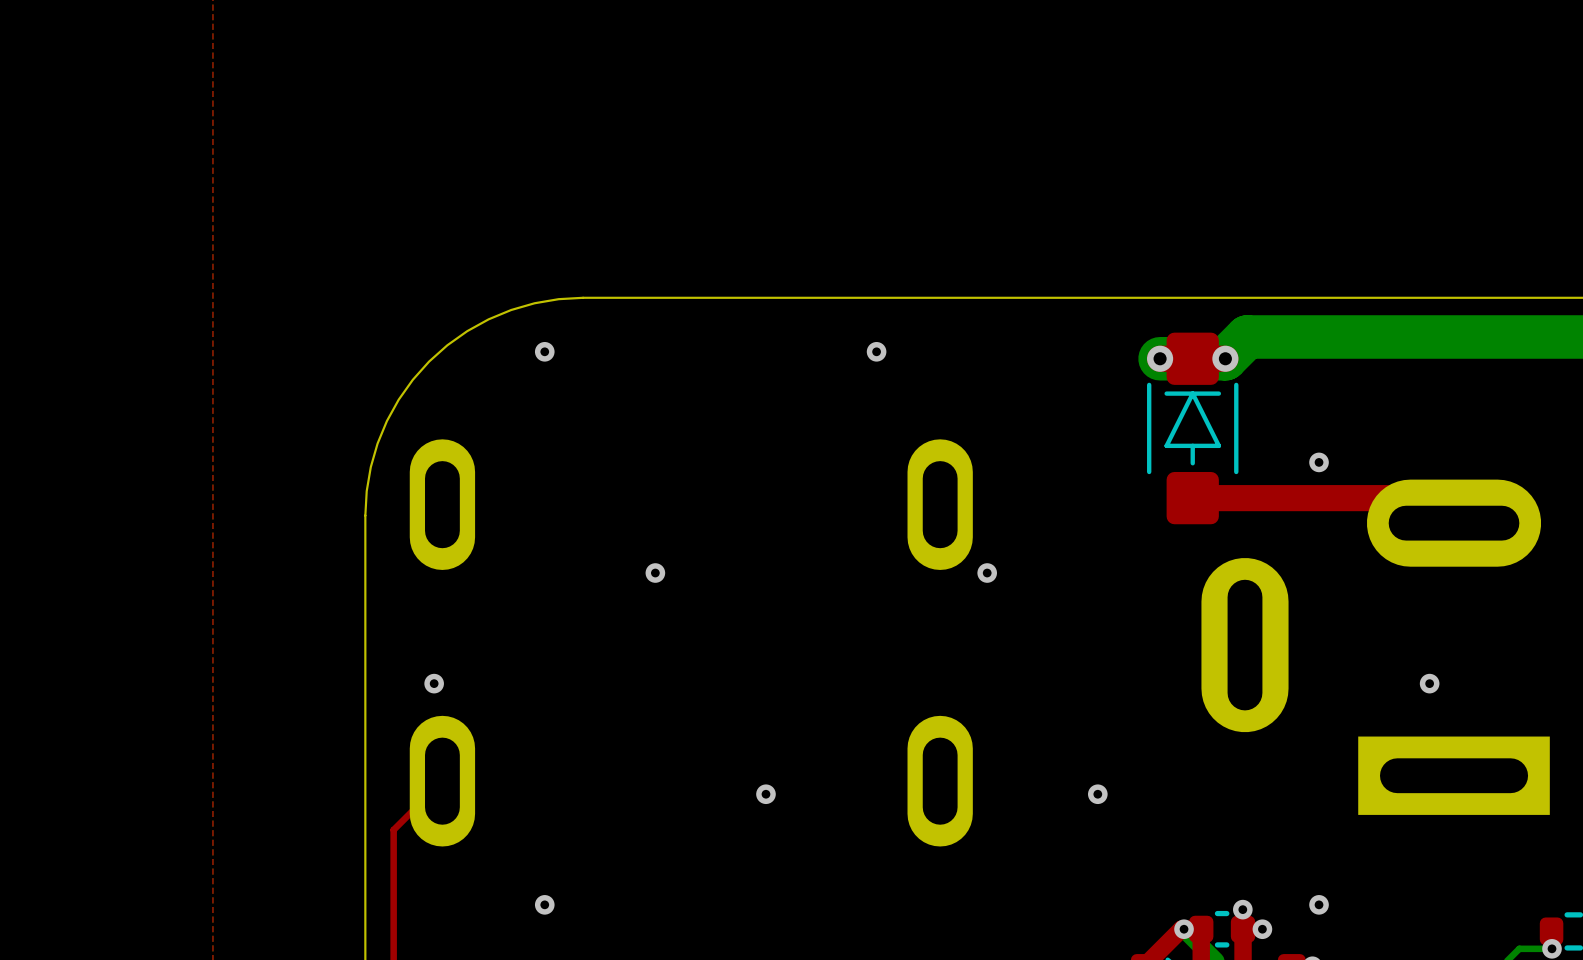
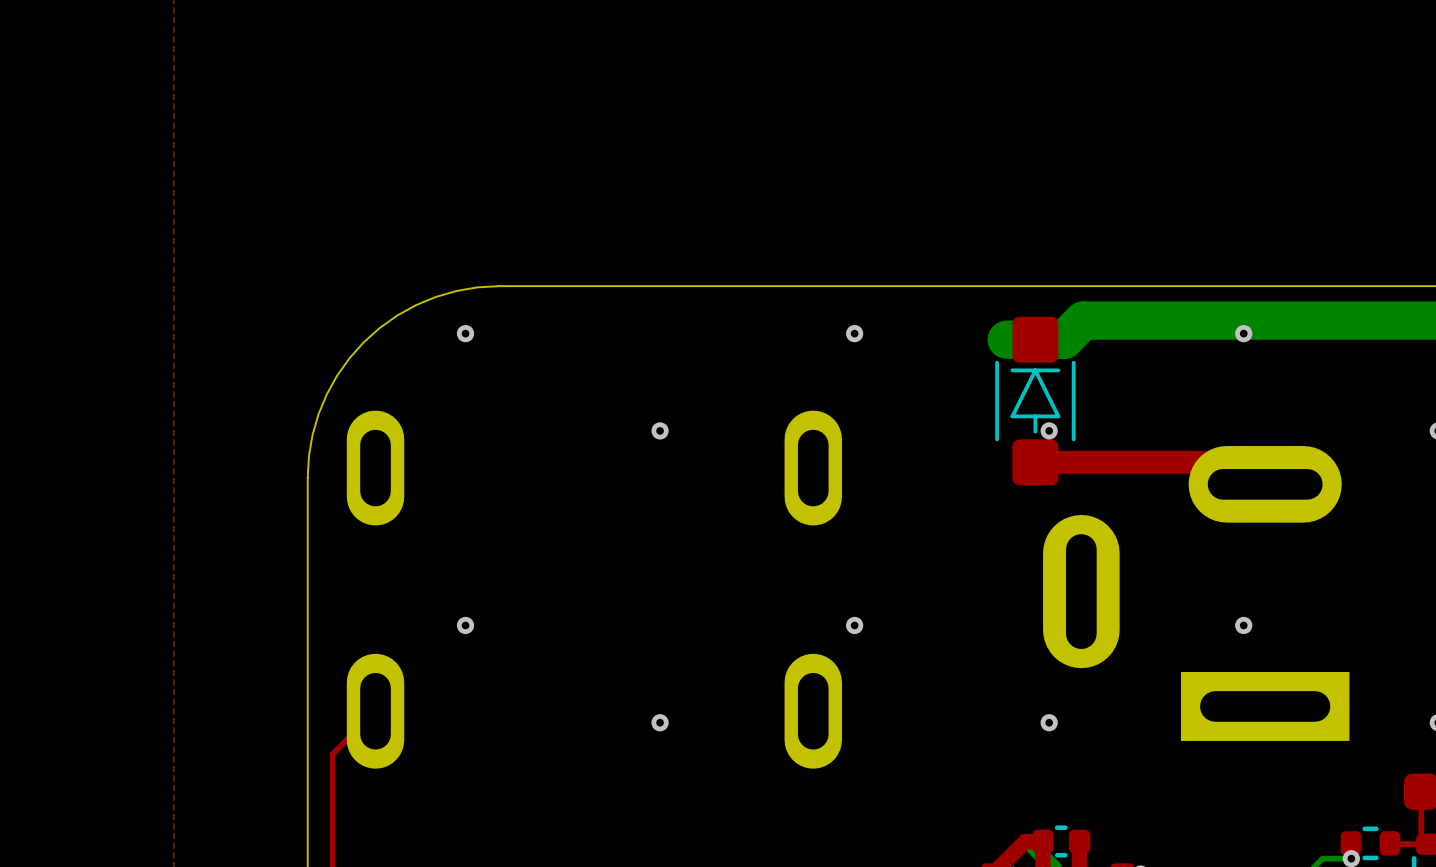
via: (876, 351) -> none
via: none -> (854, 333)
via: none -> (1243, 333)
via: (1160, 358) -> none
via: (1225, 358) -> none
via: none -> (660, 430)
via: none -> (1049, 430)
via: (1319, 462) -> none
via: (655, 573) -> none
via: (987, 573) -> none
via: (434, 683) -> none
via: none -> (465, 625)
via: none -> (854, 625)
via: (1097, 794) -> none
via: none -> (1049, 722)
via: (544, 904) -> none
via: (1319, 904) -> none
via: (1242, 909) -> none
via: (1184, 929) -> none
via: (1262, 929) -> none

